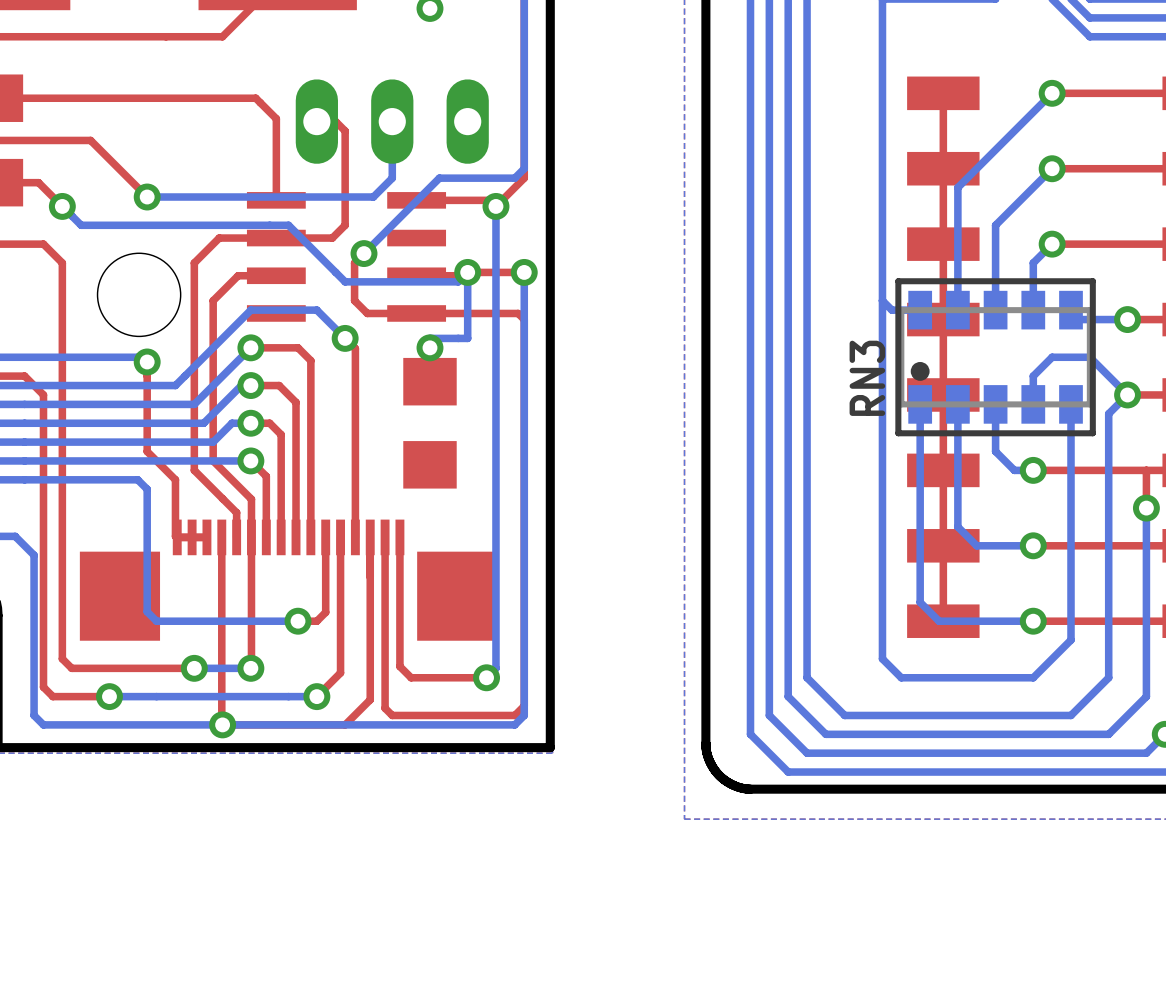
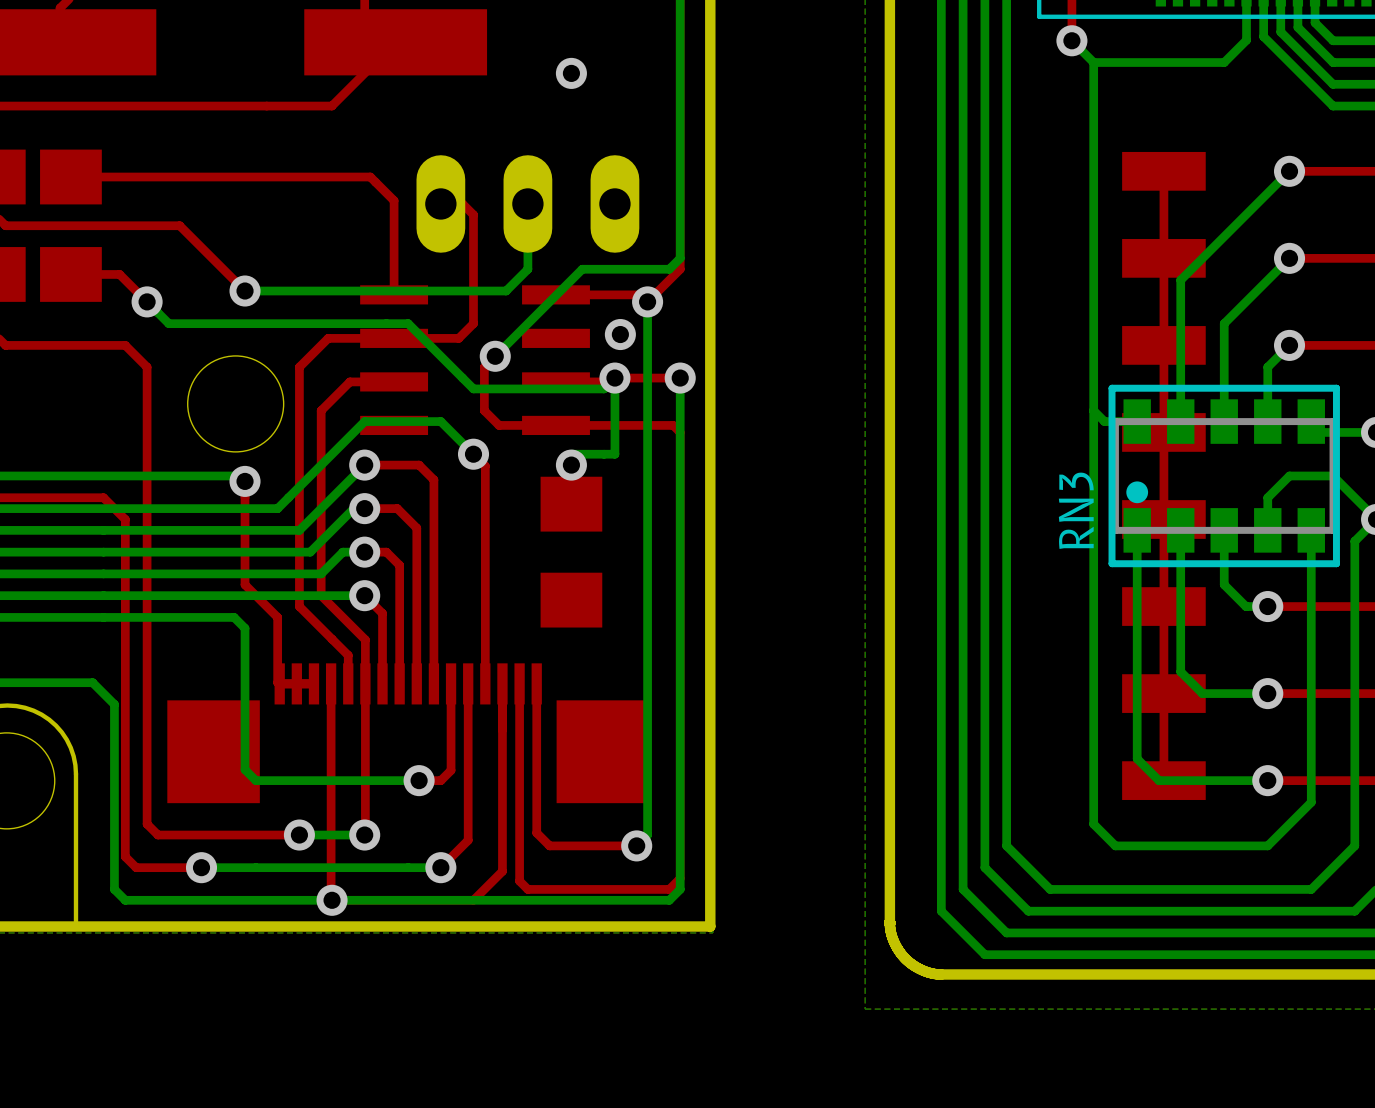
via: none -> (620, 334)

